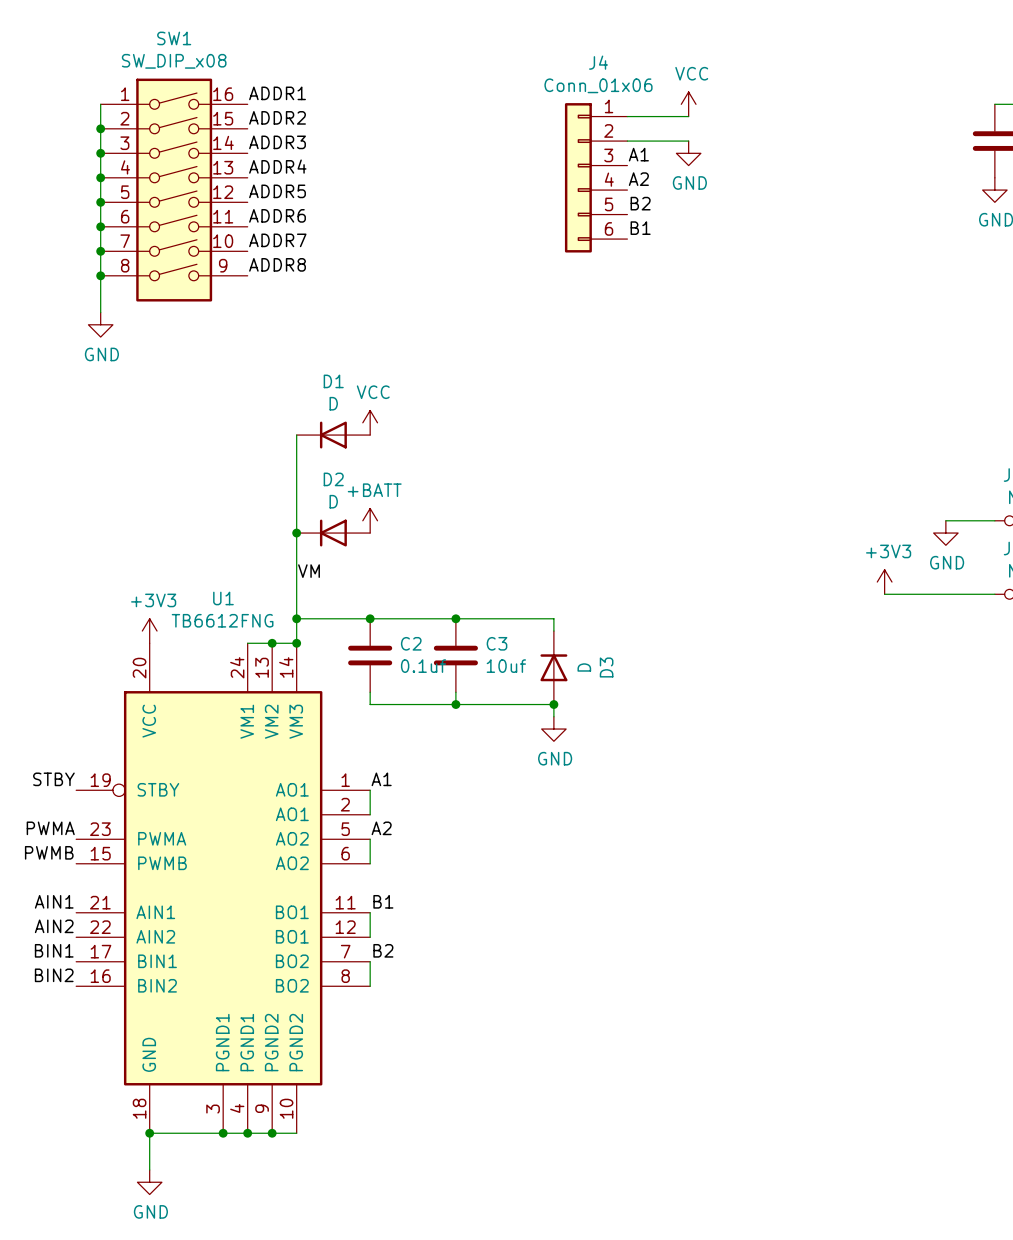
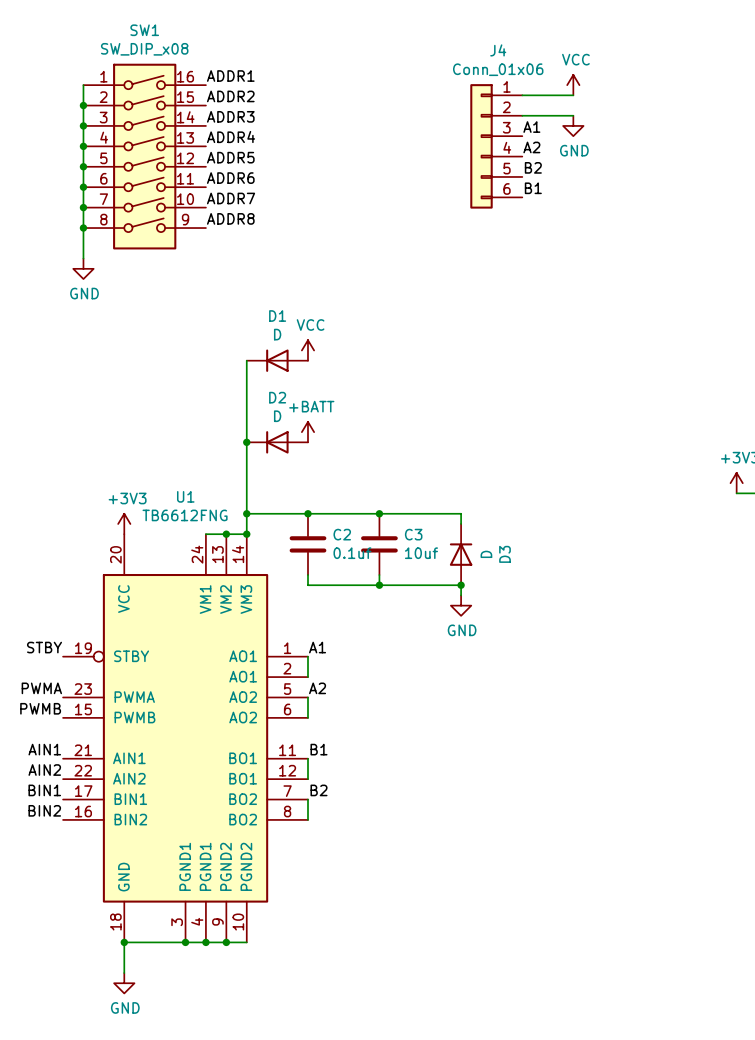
label: VM (309, 571) -> none

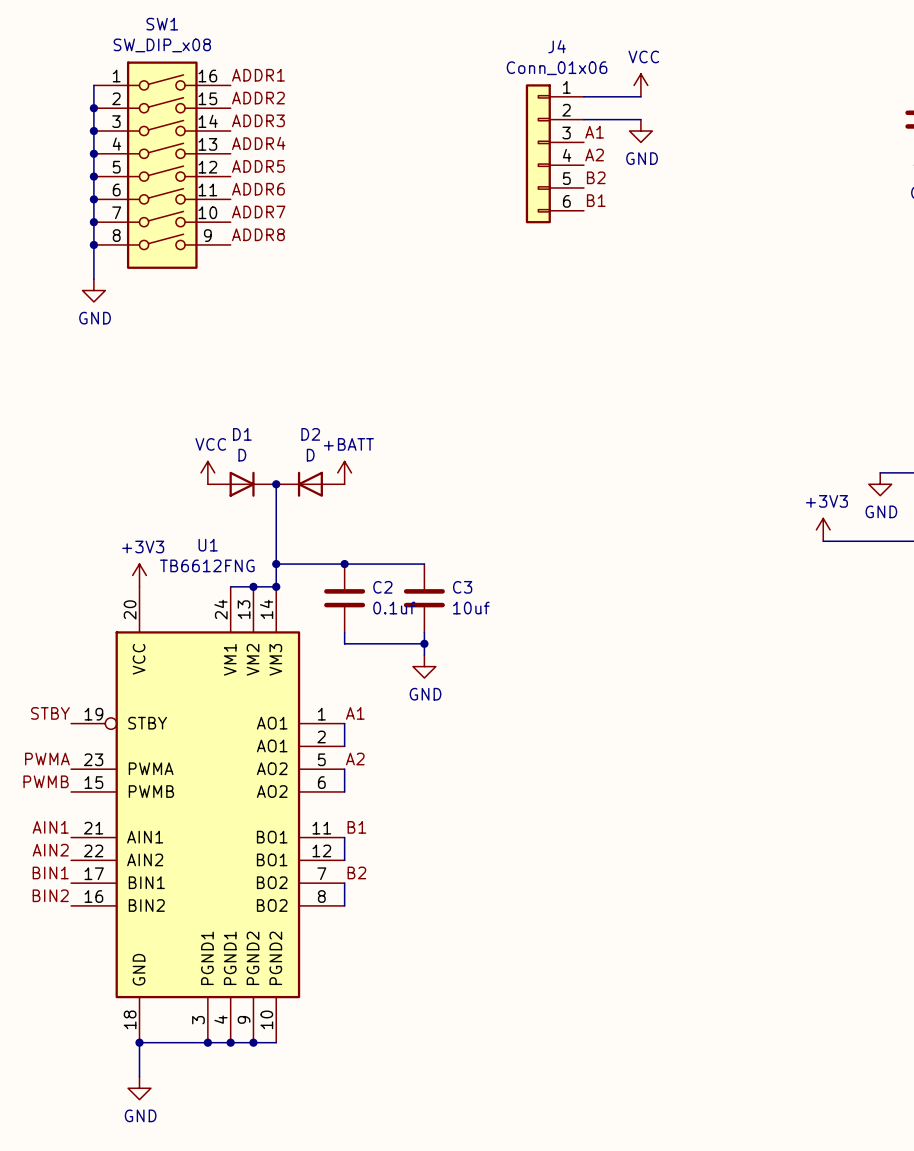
power symbol position: VCC (307, 350) -> VCC (207, 472)
wire: (246, 360) (246, 442) -> none
D1 rotation: 0° (277, 360) -> 180° (242, 484)
D1 position: (277, 360) -> (242, 484)
wire: (379, 513) (461, 513) (461, 523) -> none
junction: (379, 513) -> none
D3: D (461, 554) -> none
wire: (379, 585) (461, 585) (461, 595) -> (424, 643) (424, 655)
junction: (461, 585) -> none
power symbol position: GND (461, 605) -> GND (424, 666)

